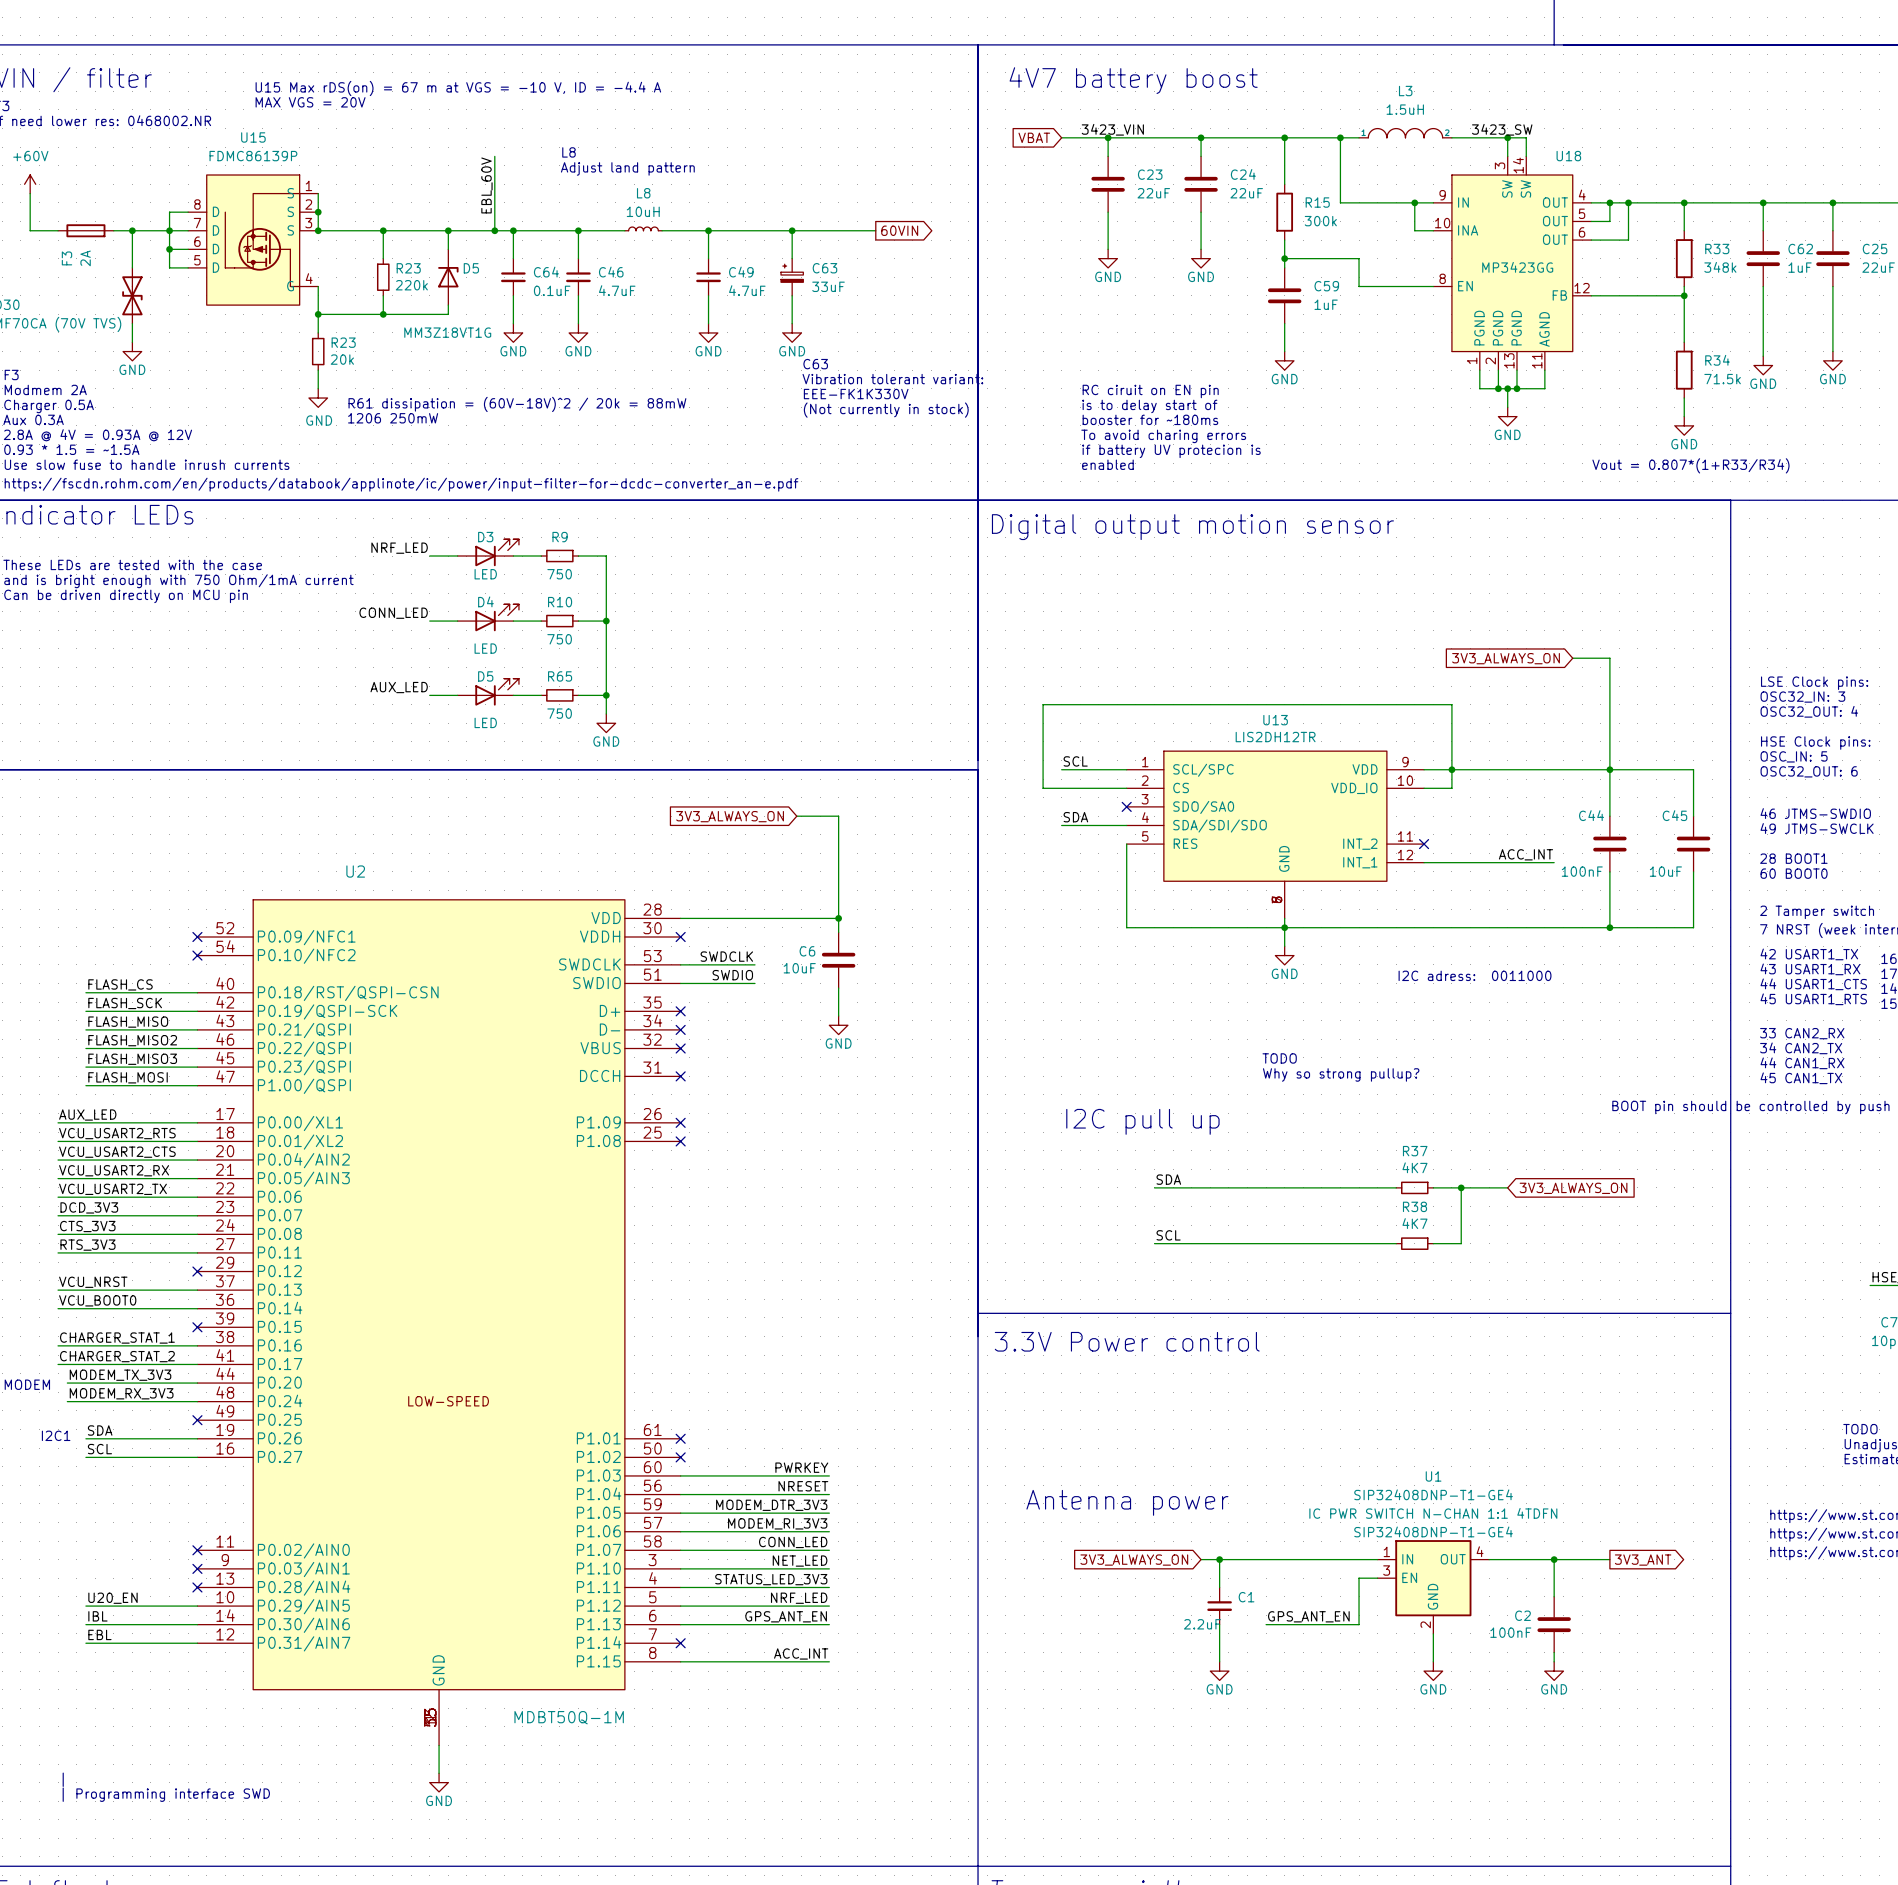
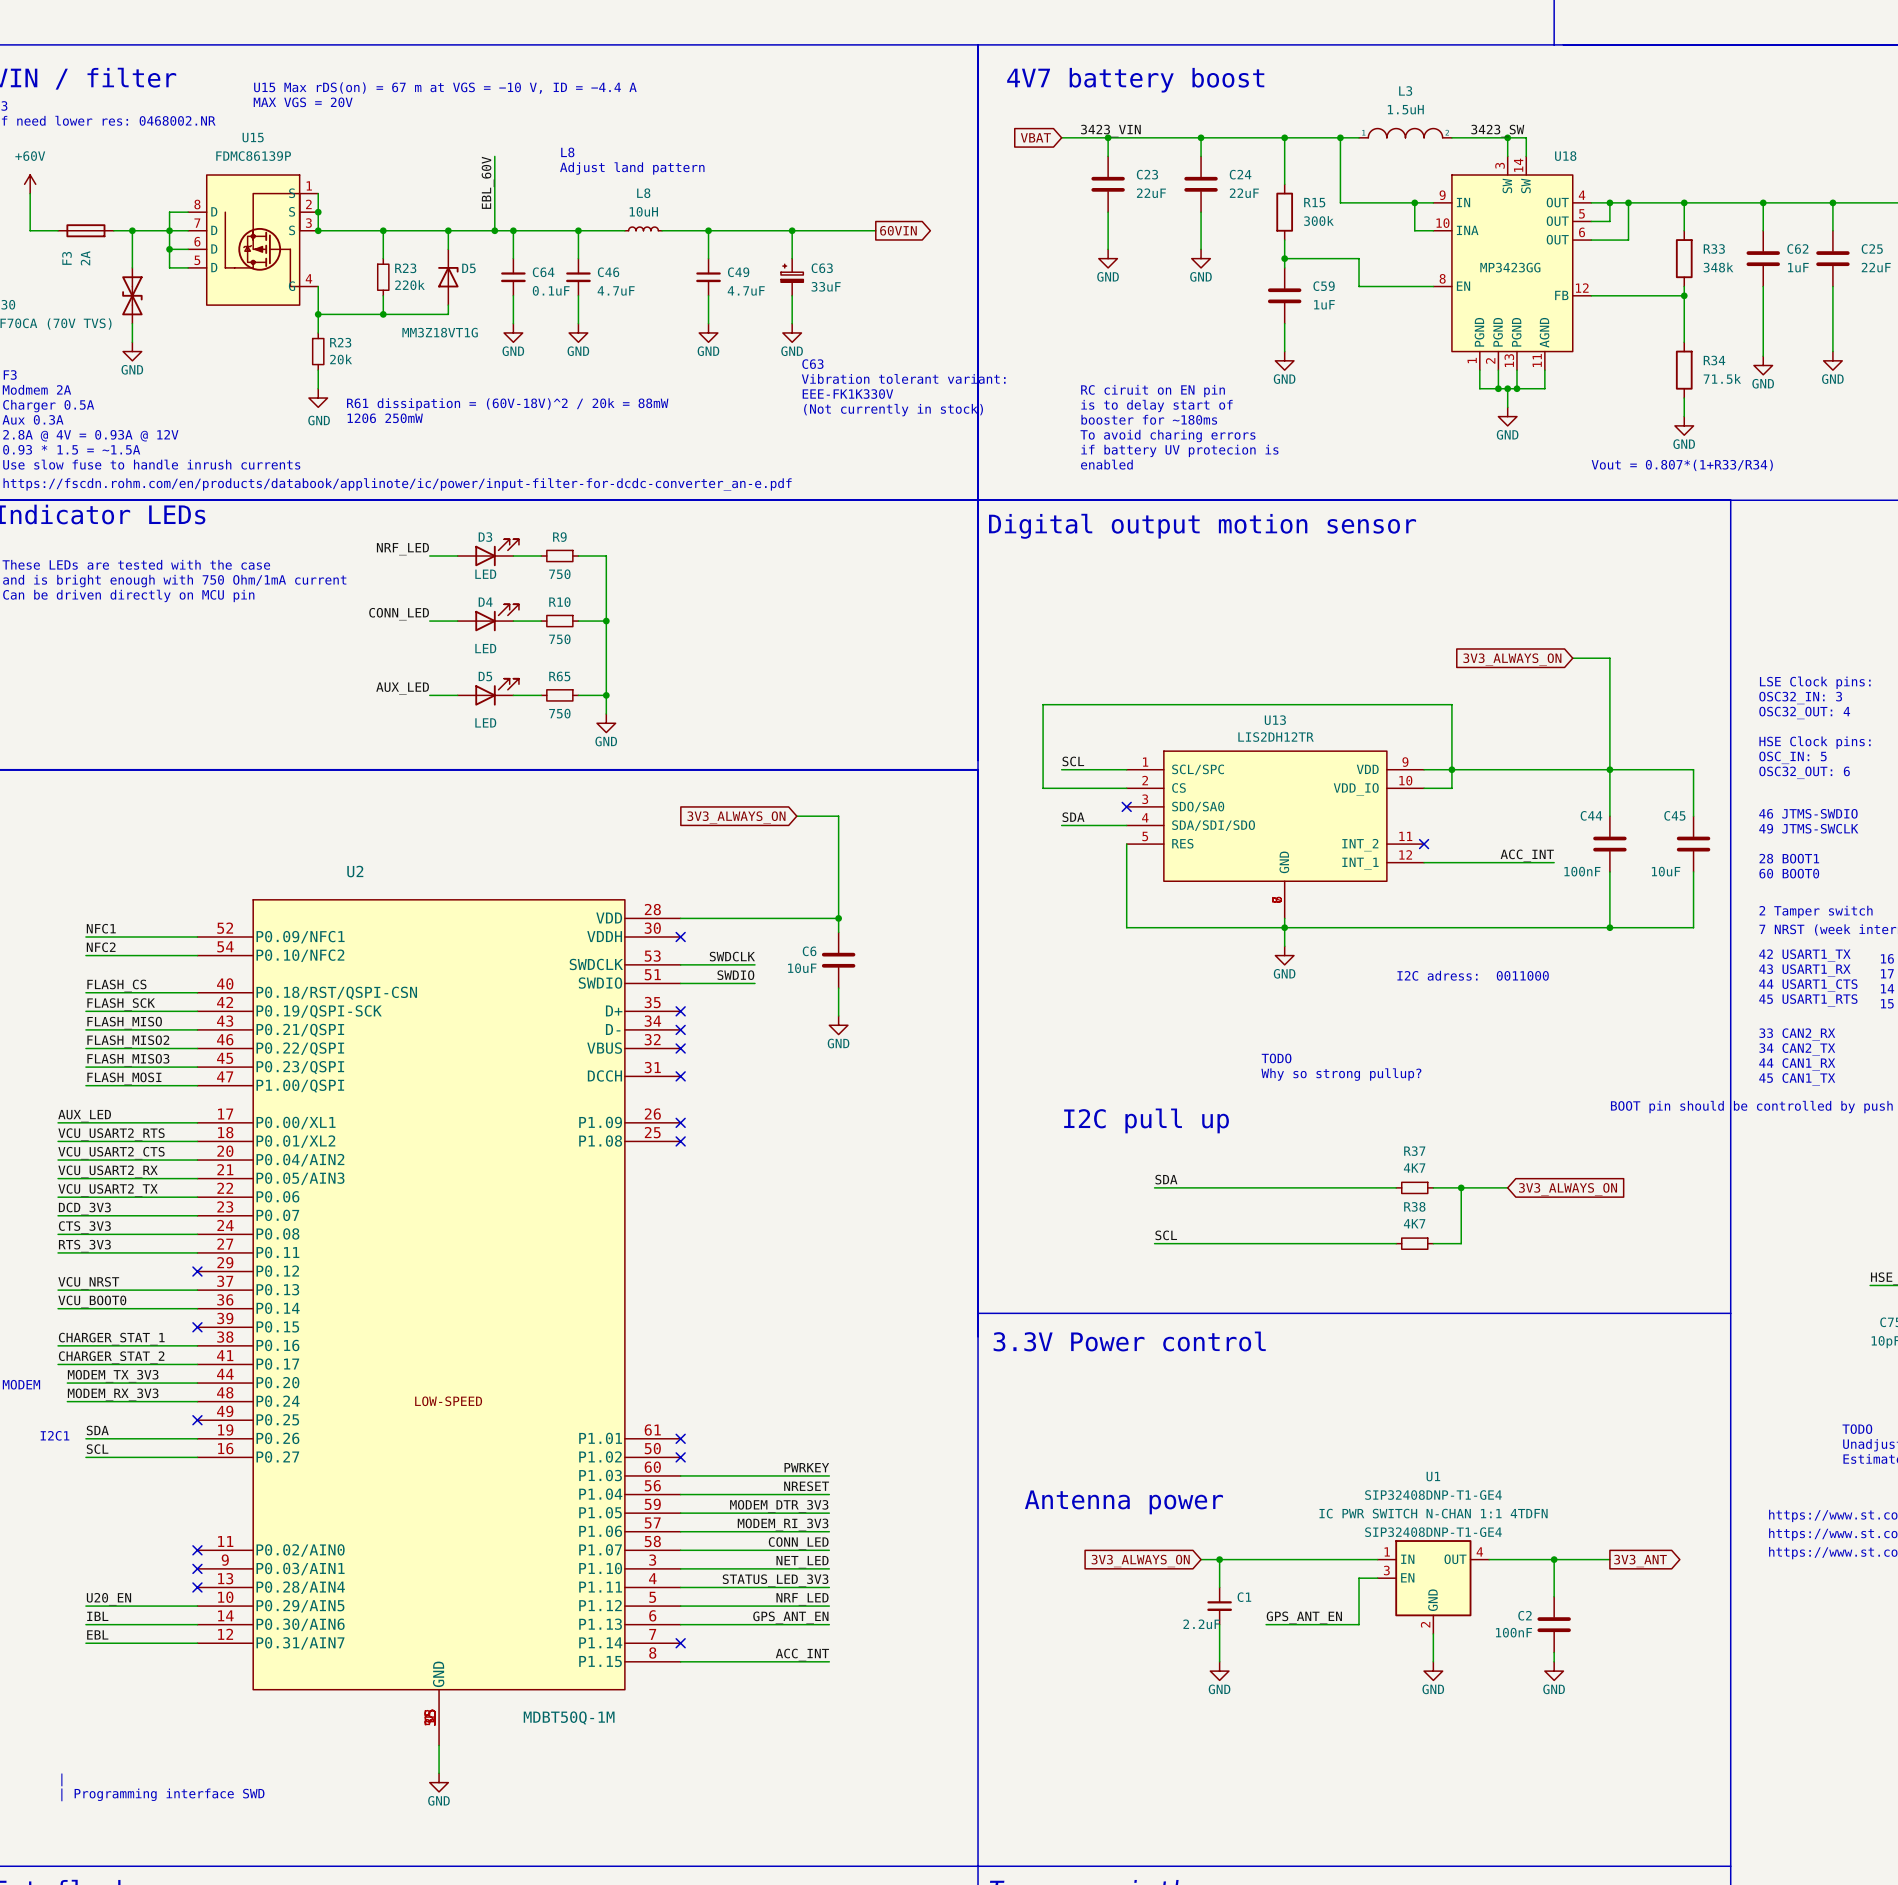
label: none -> NFC1 (101, 928)
wire: none -> (85, 936) (197, 936)
no-connect mark: (197, 936) -> none
label: none -> NFC2 (101, 947)
wire: none -> (85, 955) (197, 955)
no-connect mark: (197, 955) -> none

